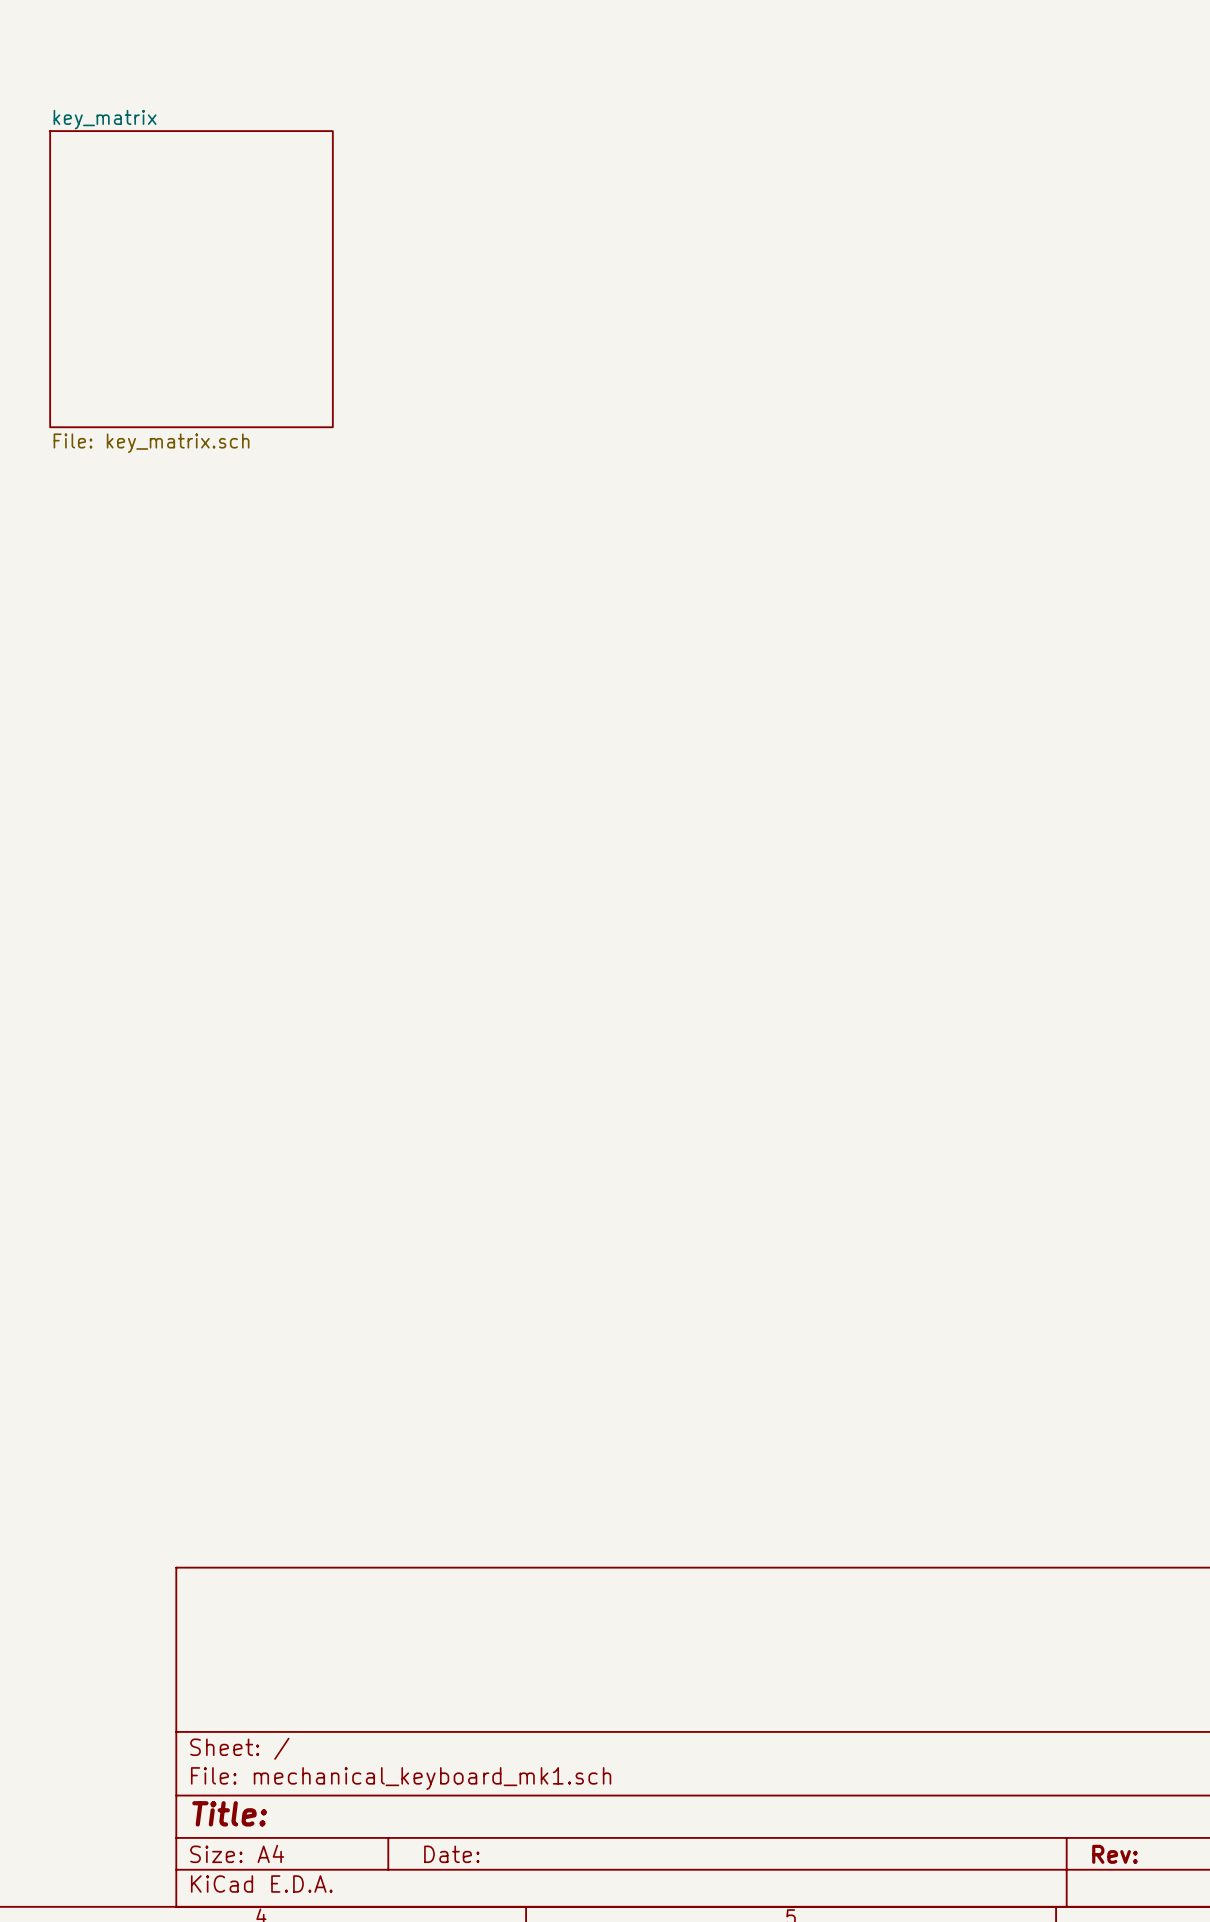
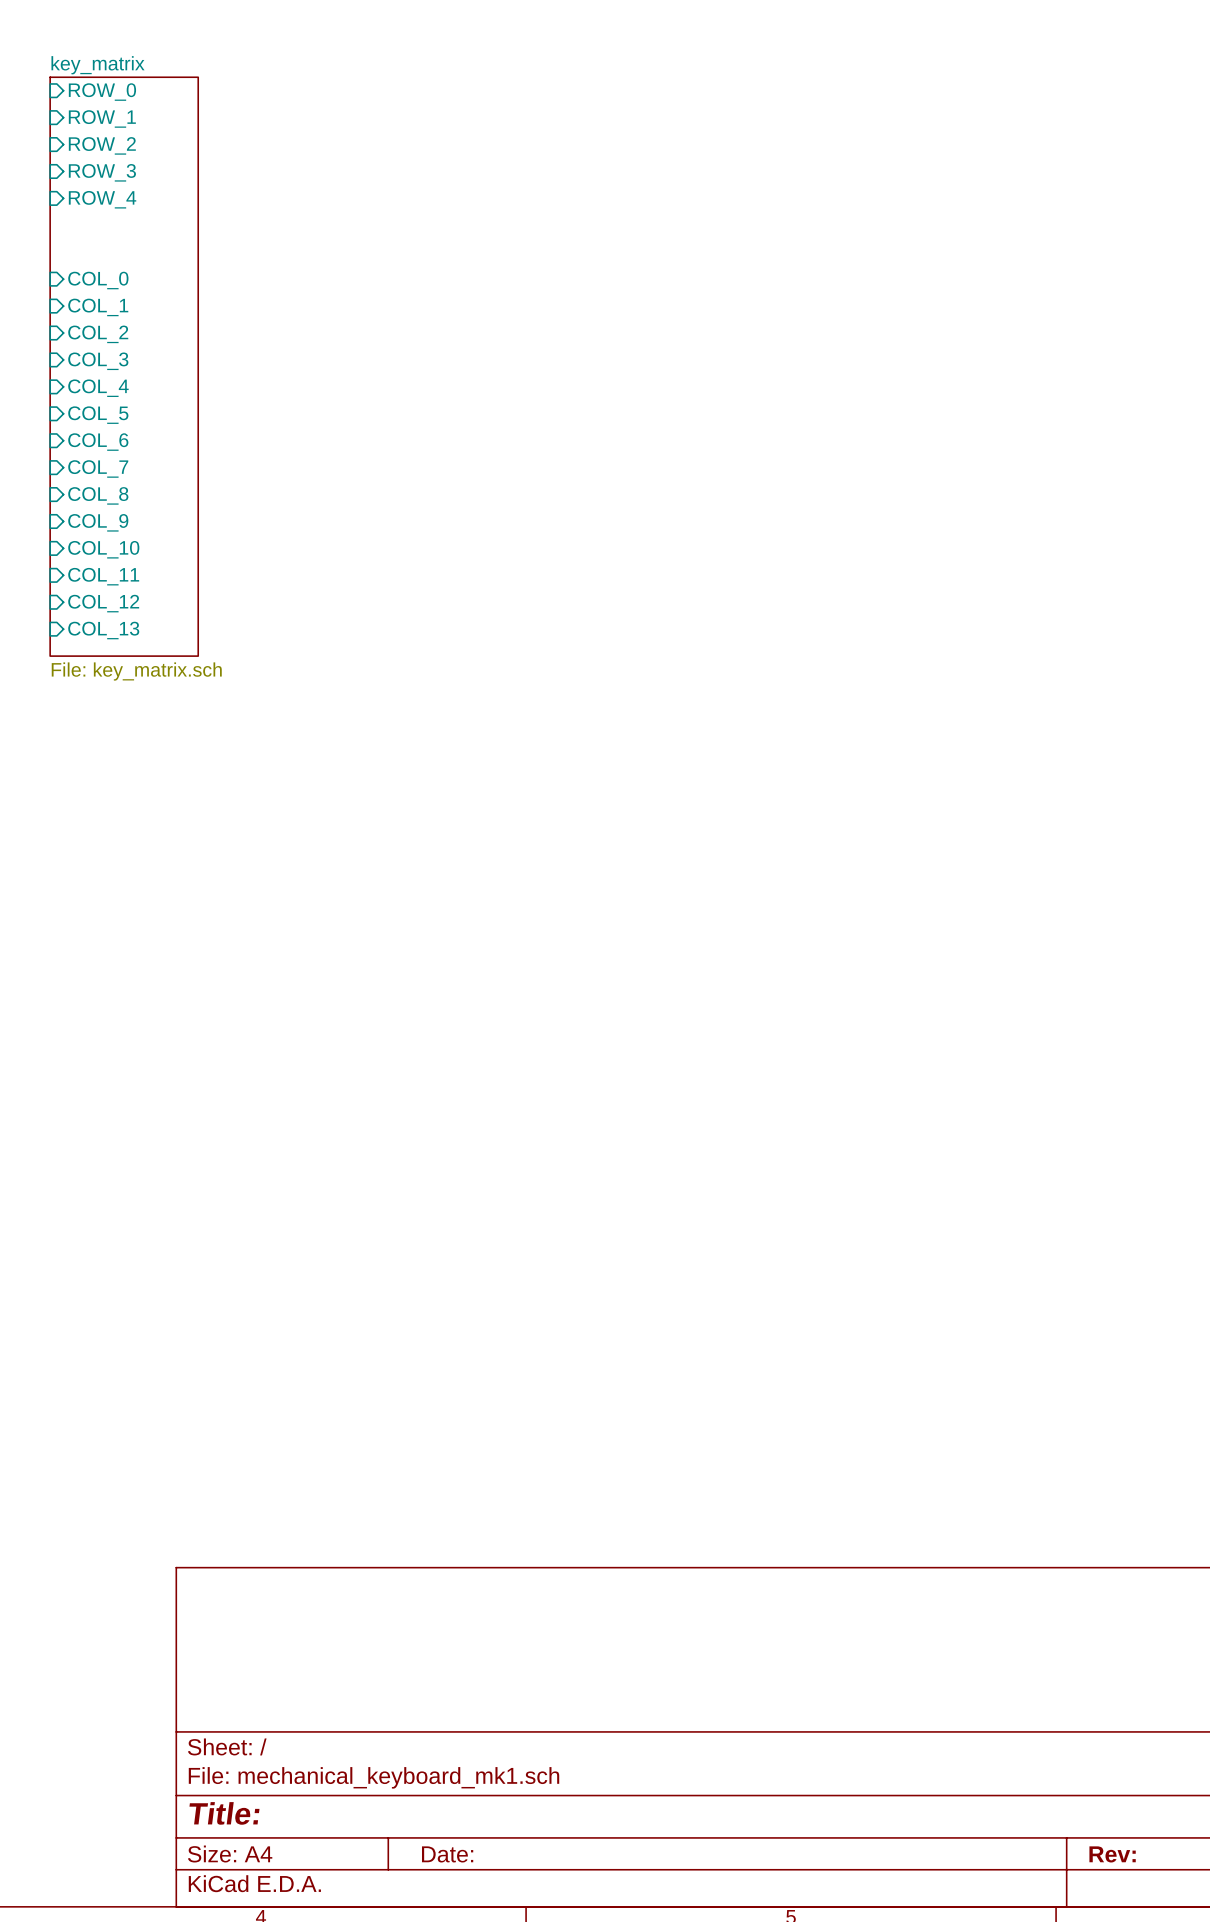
sheet pin: none -> ROW_0 (102, 92)
sheet pin: none -> ROW_1 (102, 118)
sheet pin: none -> ROW_2 (102, 145)
sheet pin: none -> ROW_3 (102, 172)
sheet pin: none -> ROW_4 (102, 199)
sheet pin: none -> COL_0 (98, 280)
sheet key_matrix: File: key_matrix.sch (191, 279) -> none
sheet pin: none -> COL_1 (98, 307)
sheet pin: none -> COL_2 (98, 334)
sheet pin: none -> COL_3 (98, 361)
sheet key_matrix: none -> File: key_matrix.sch (124, 366)
sheet pin: none -> COL_4 (98, 388)
sheet pin: none -> COL_5 (98, 415)
sheet pin: none -> COL_6 (98, 442)
sheet pin: none -> COL_7 (98, 468)
sheet pin: none -> COL_8 (98, 495)
sheet pin: none -> COL_9 (98, 522)
sheet pin: none -> COL_10 (103, 549)
sheet pin: none -> COL_11 (103, 576)
sheet pin: none -> COL_12 (103, 603)
sheet pin: none -> COL_13 (103, 630)

